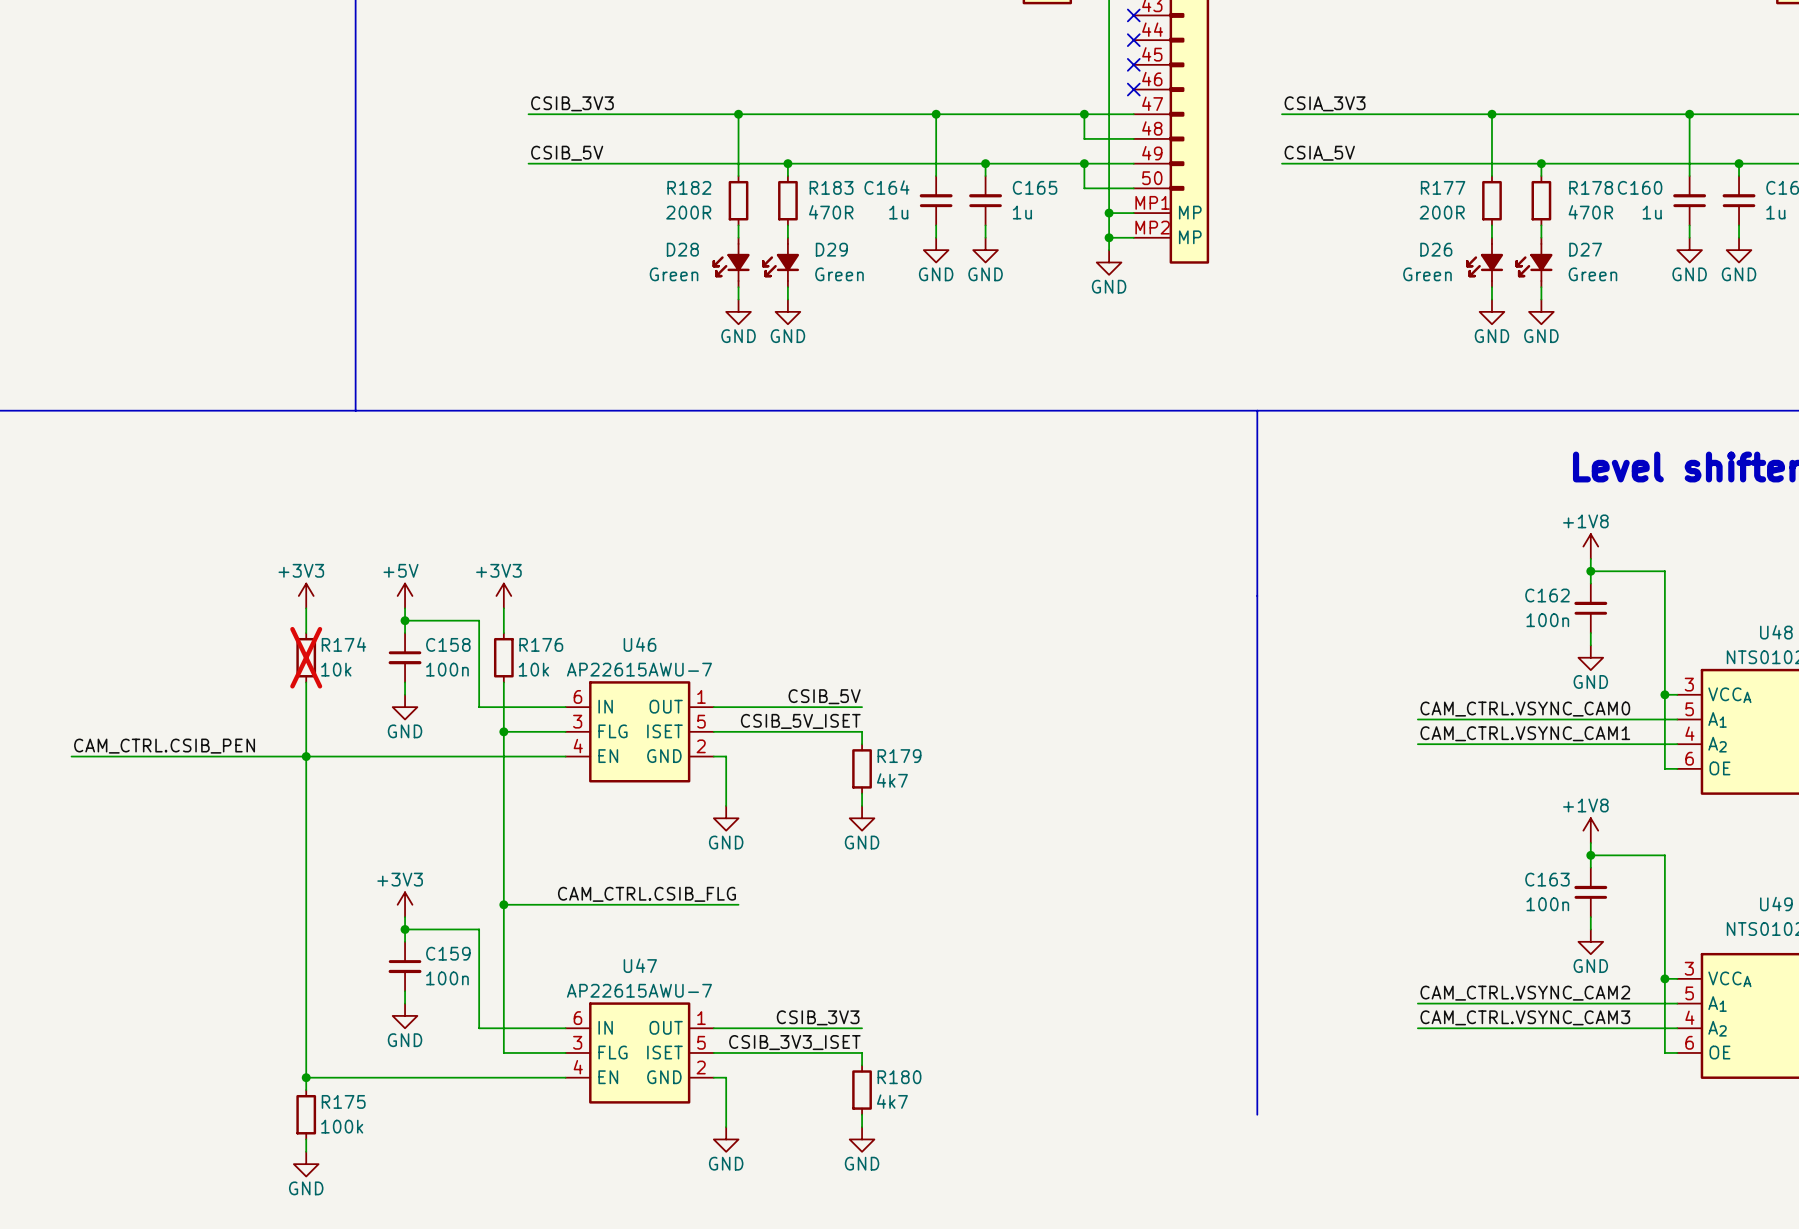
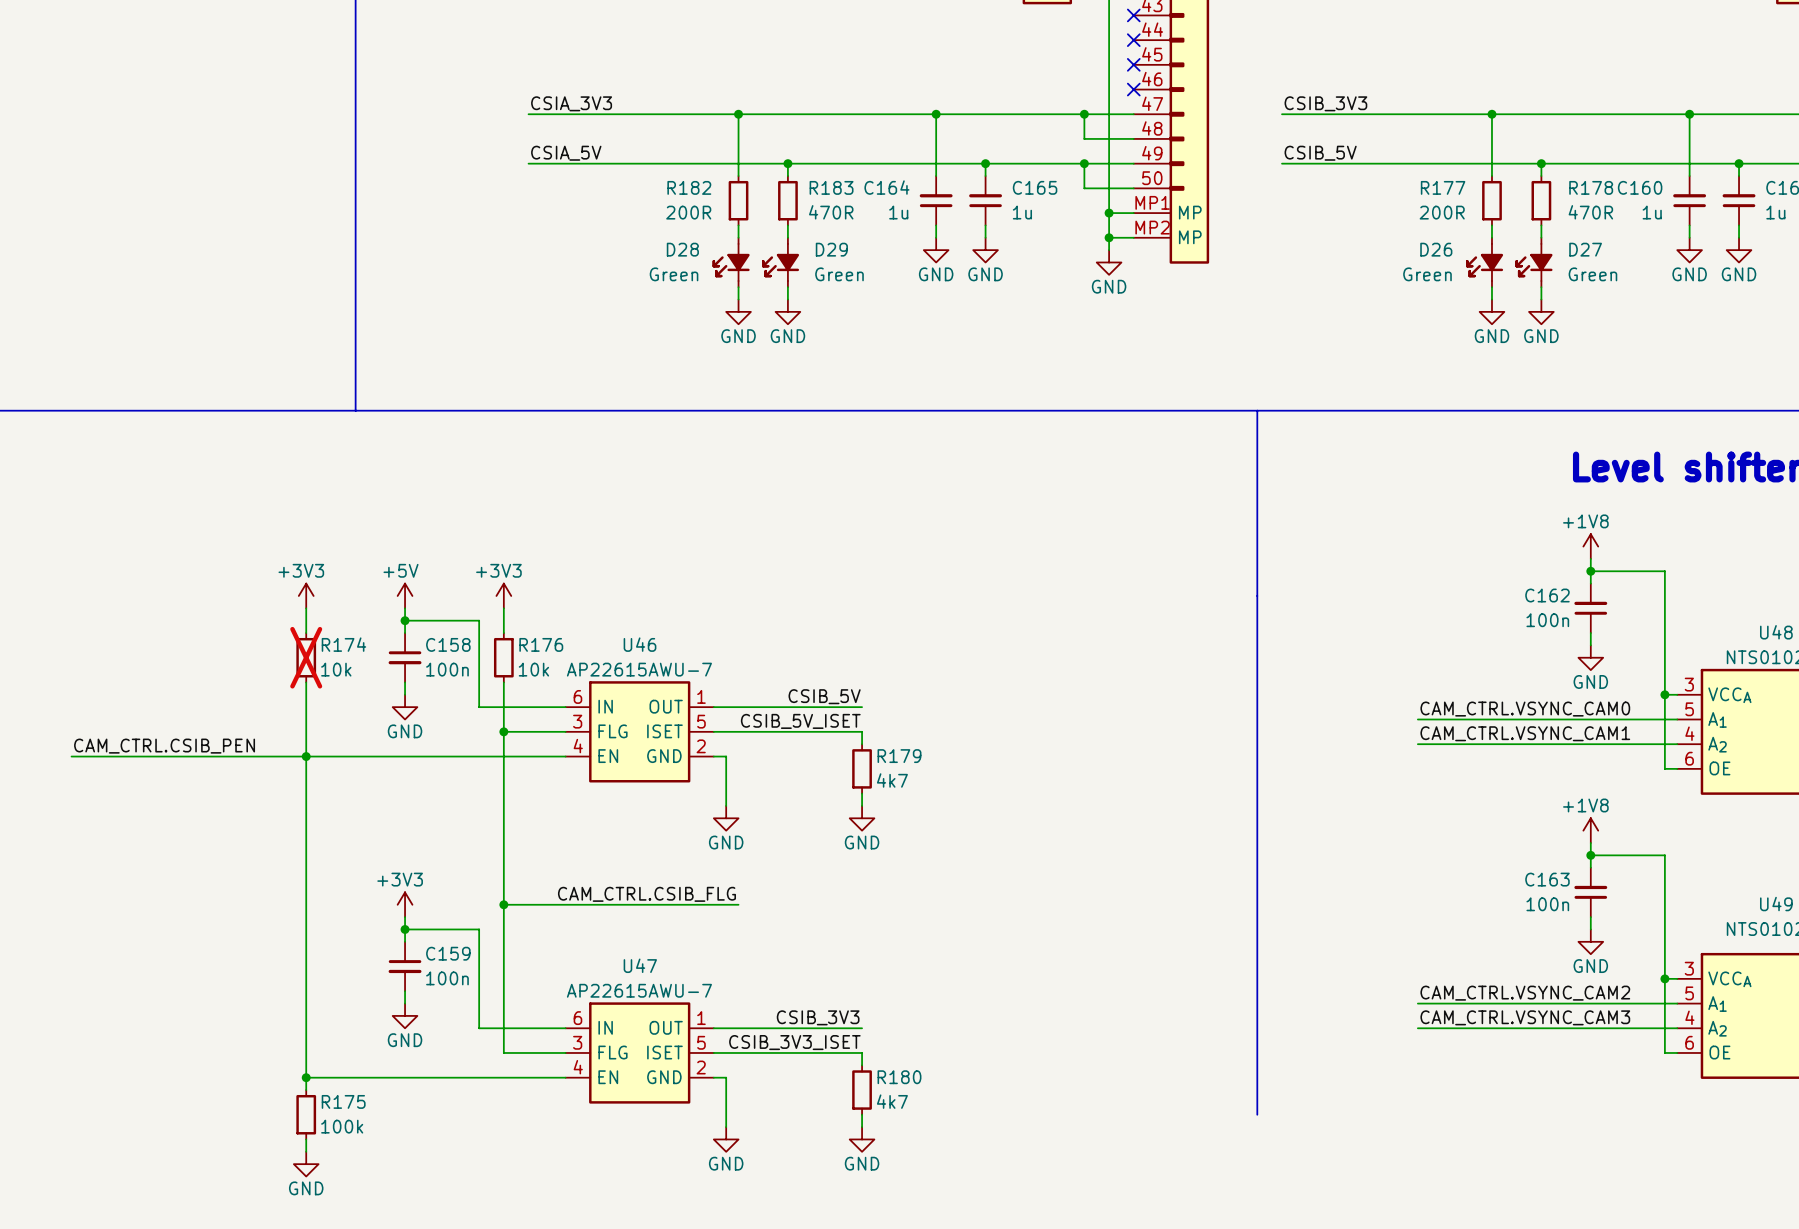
label: CSIB_3V3 (572, 103) -> CSIA_3V3 (571, 103)
label: CSIA_3V3 (1325, 103) -> CSIB_3V3 (1325, 103)
label: CSIB_5V (567, 153) -> CSIA_5V (566, 153)
label: CSIA_5V (1319, 153) -> CSIB_5V (1320, 153)

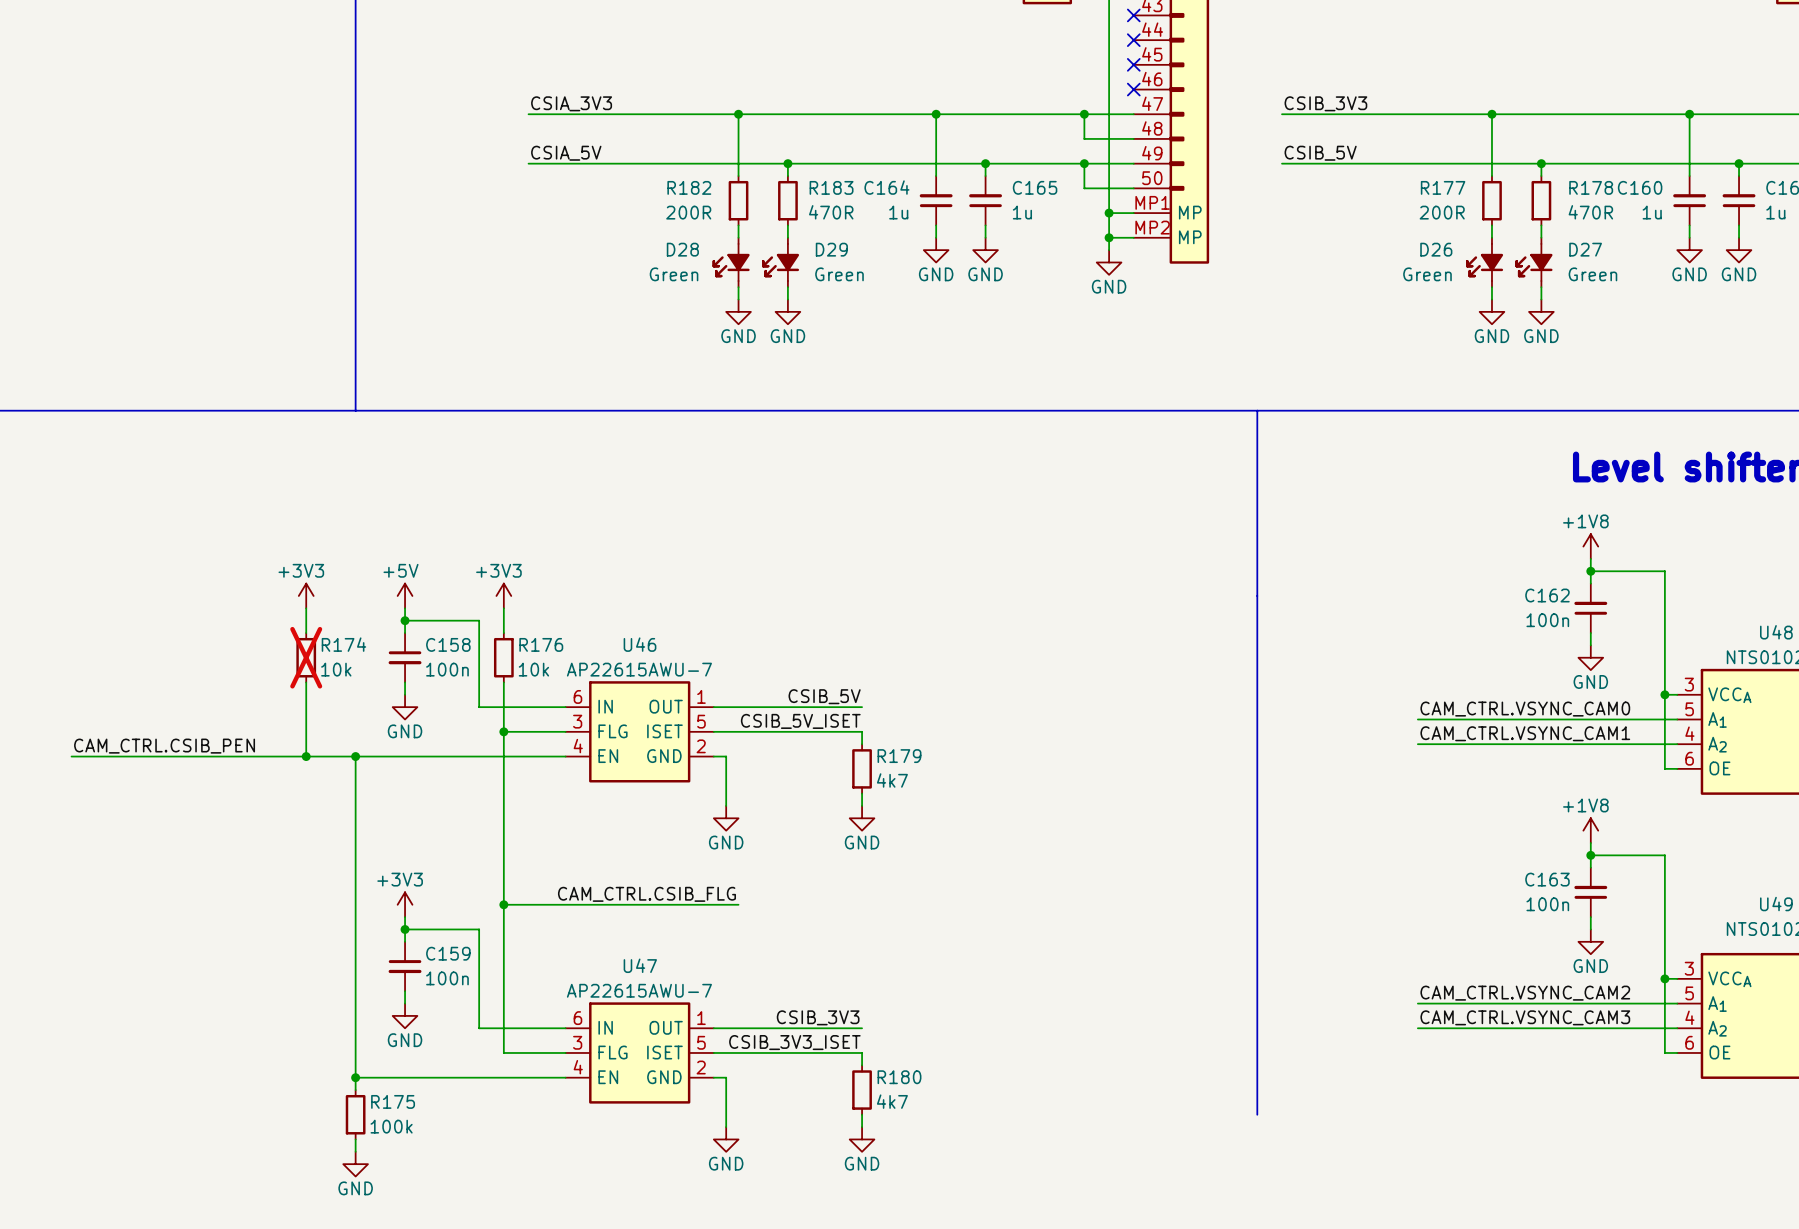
wire: (306, 756) (306, 1090) -> (355, 756) (355, 1090)
junction: none -> (355, 756)
wire: (306, 1077) (355, 1077) -> none
junction position: (306, 1077) -> (355, 1077)
R175 position: (306, 1114) -> (355, 1114)
wire: (306, 1139) (306, 1151) -> (355, 1139) (355, 1151)
power symbol position: GND (306, 1164) -> GND (355, 1164)

